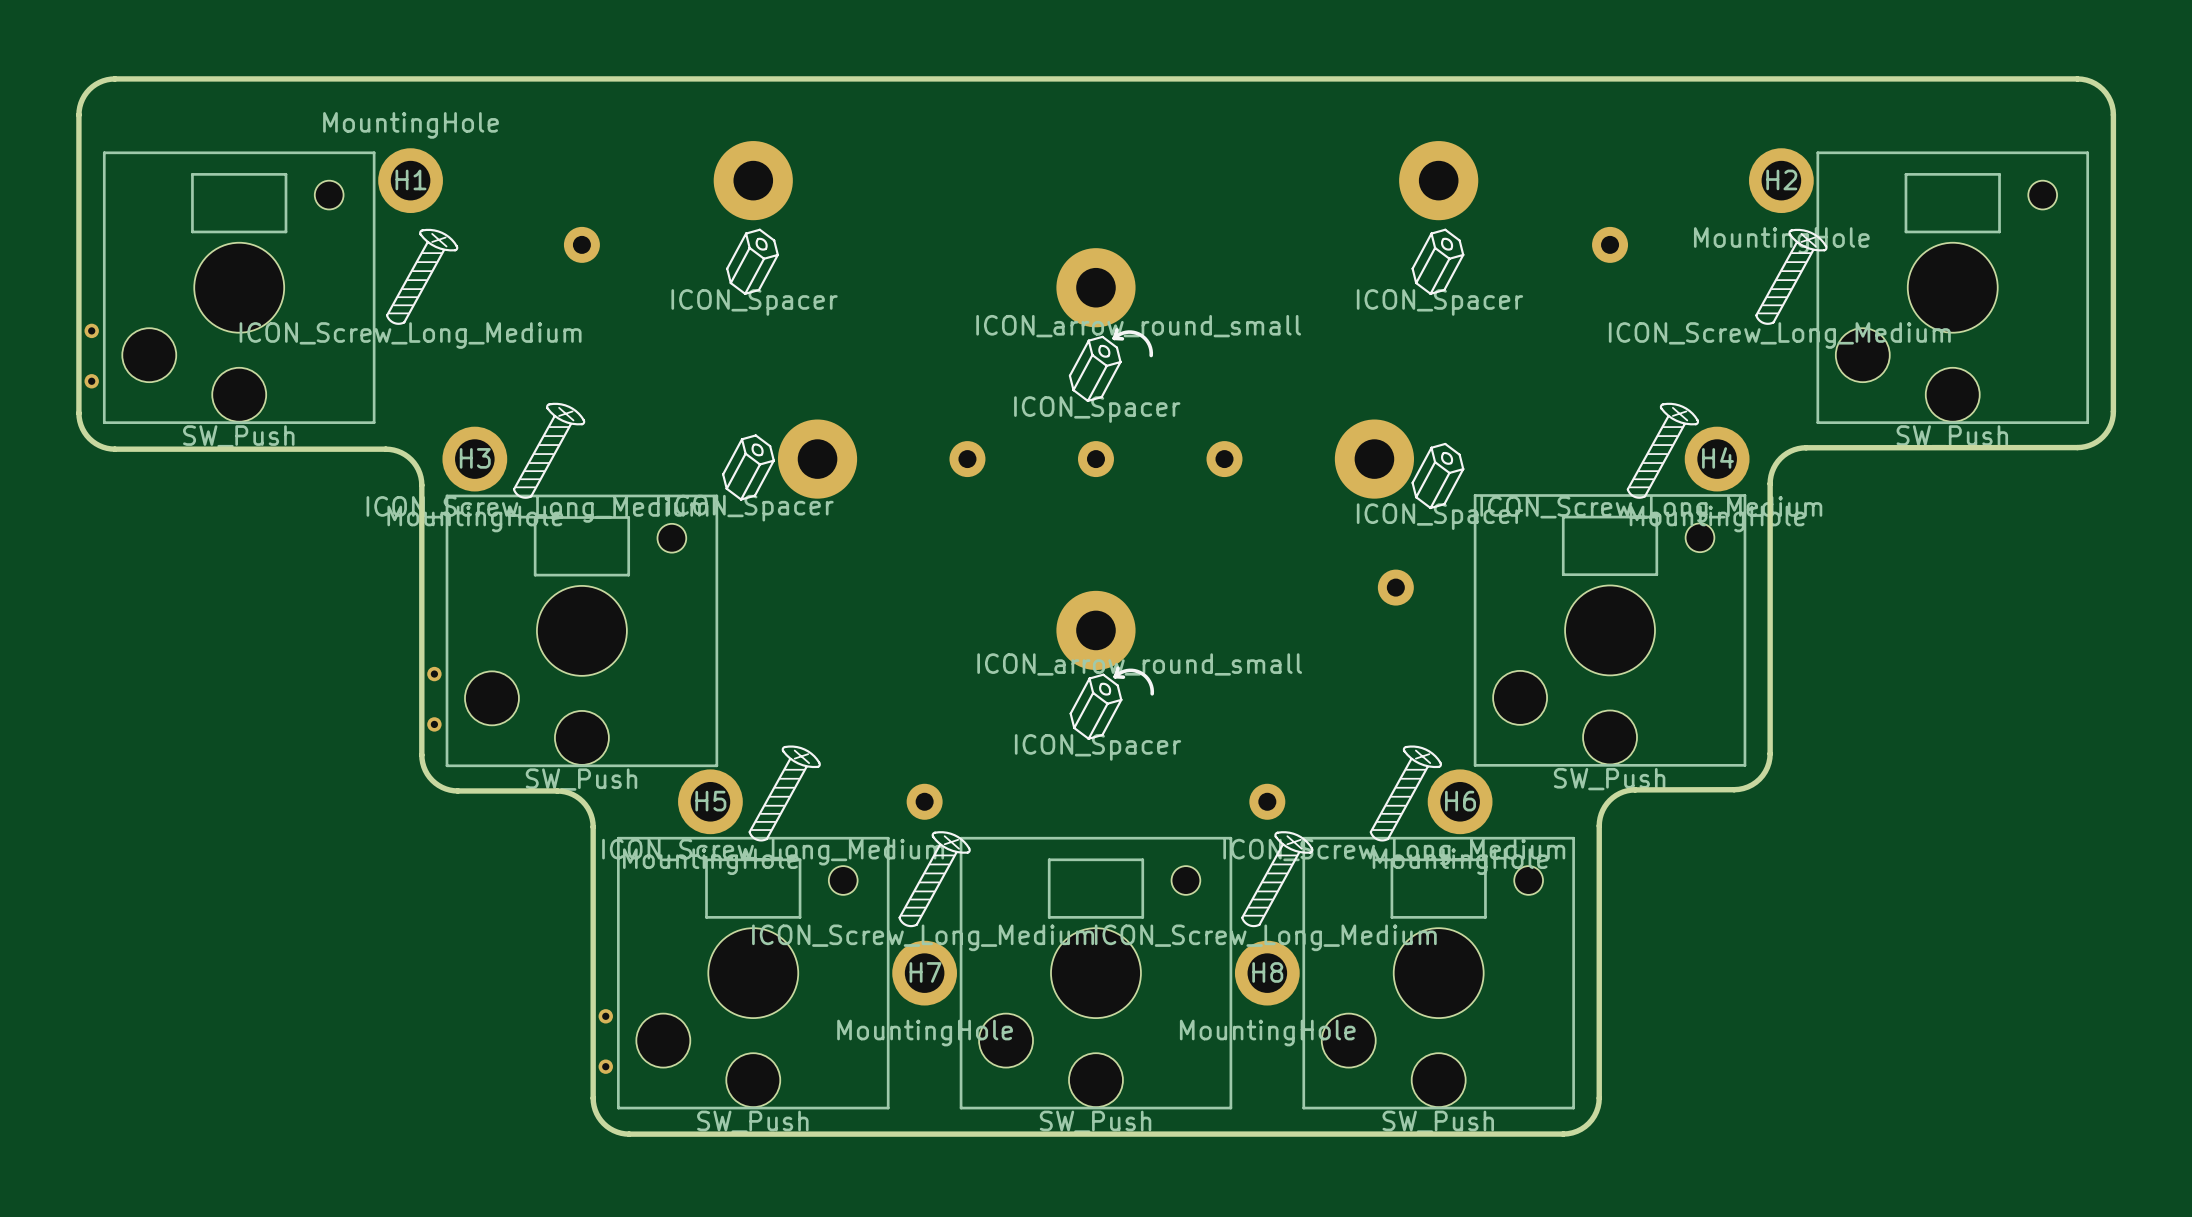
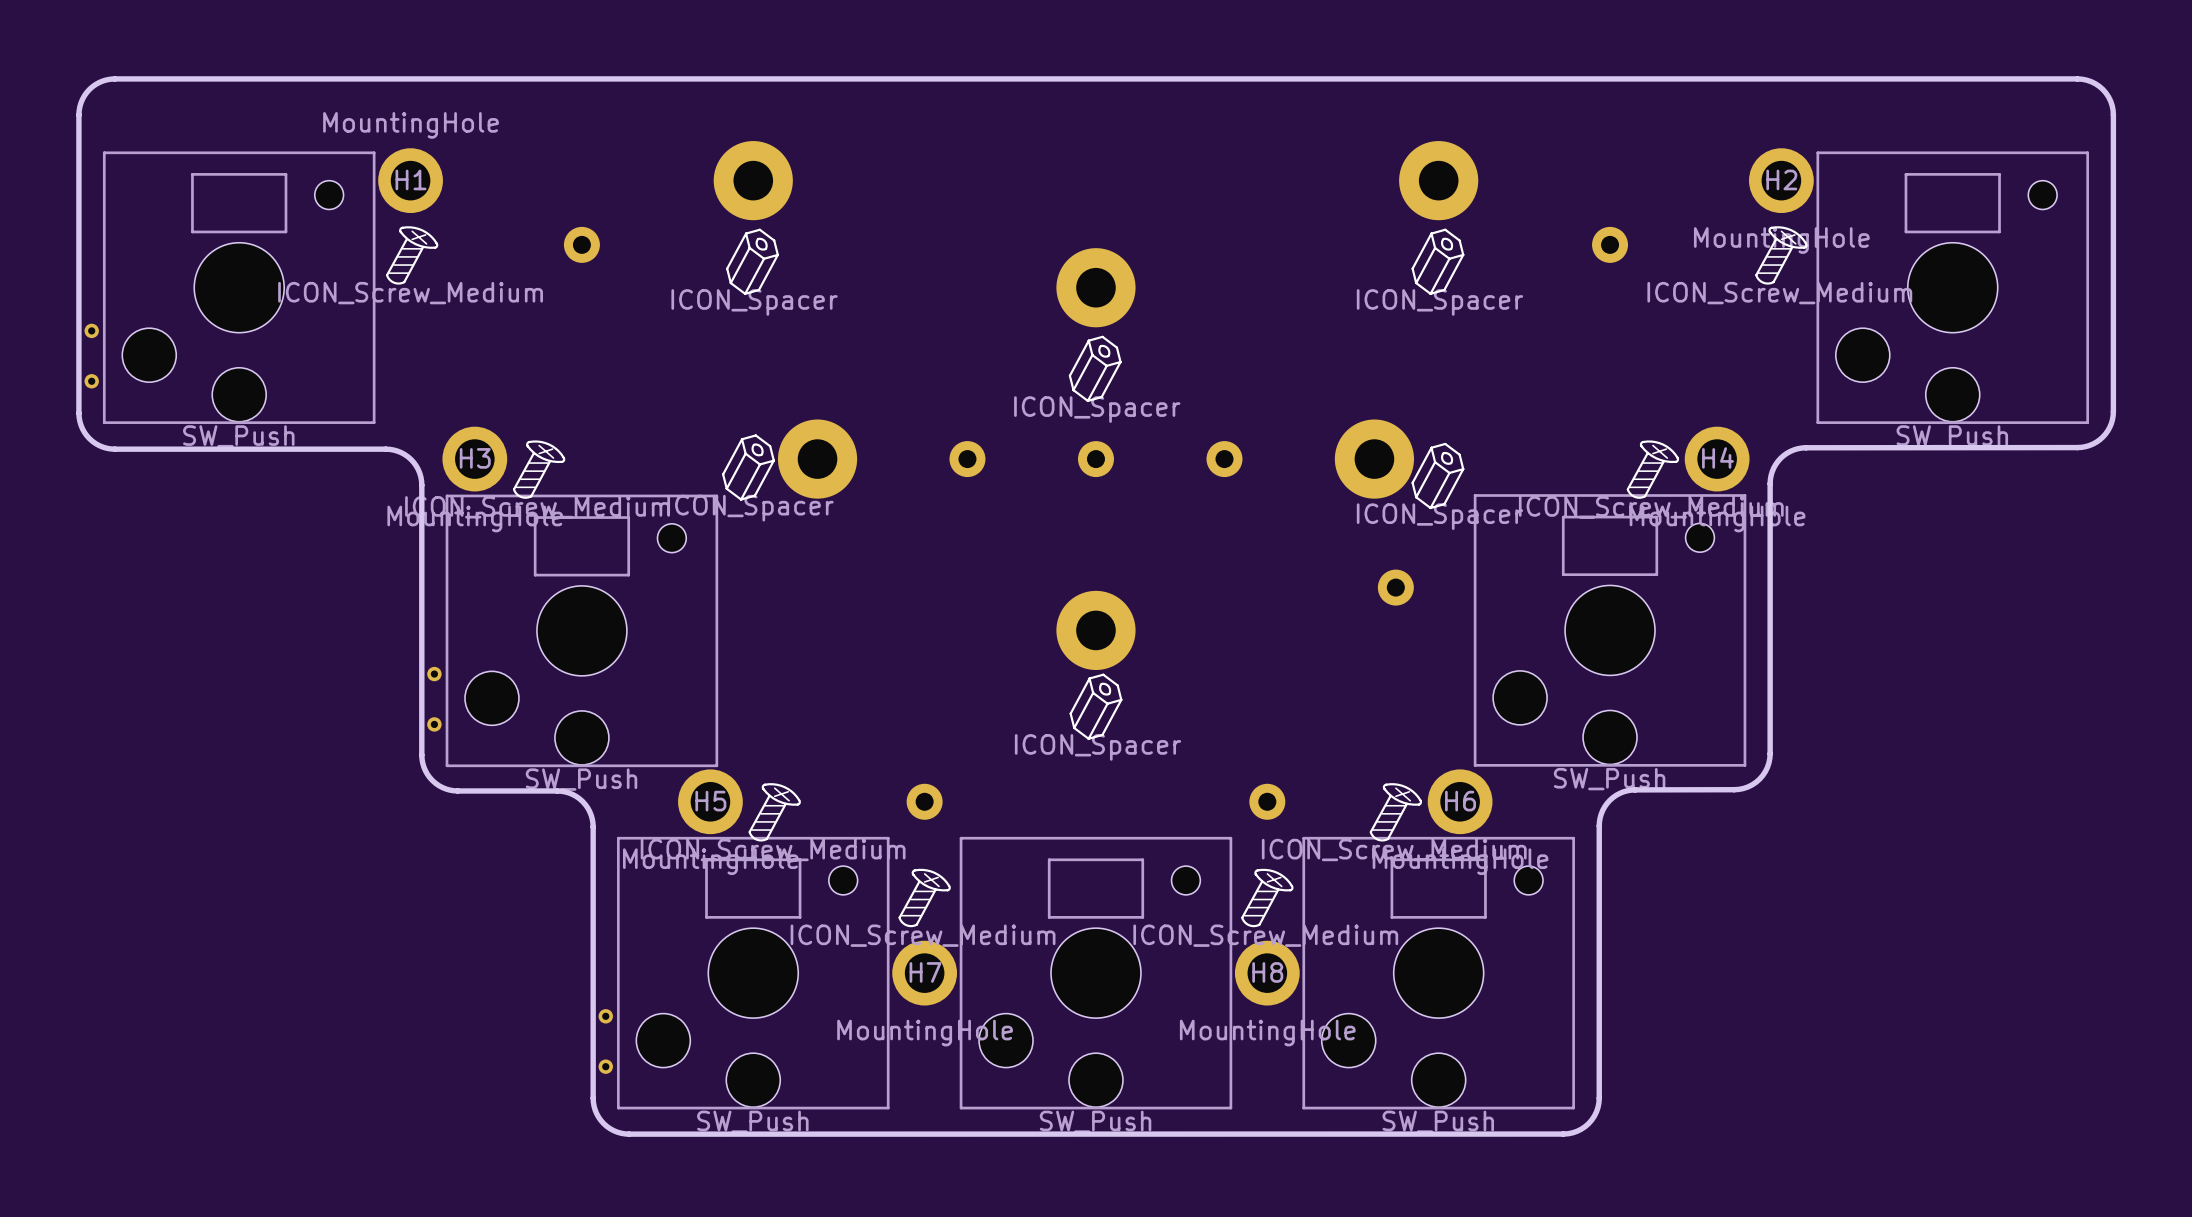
drawing: none -> [385, 226, 439, 285]
drawing: none -> [1755, 226, 1808, 285]
drawing: [385, 228, 459, 325] -> none
drawing: [1755, 228, 1828, 325] -> none
drawing: [1112, 328, 1154, 358] -> none
drawing: [512, 402, 586, 499] -> none
drawing: [1626, 402, 1700, 499] -> none
drawing: none -> [512, 440, 566, 499]
drawing: none -> [1626, 440, 1680, 499]
drawing: [1113, 666, 1155, 696] -> none
drawing: [748, 745, 1443, 928] -> none
drawing: none -> [748, 783, 1423, 928]

